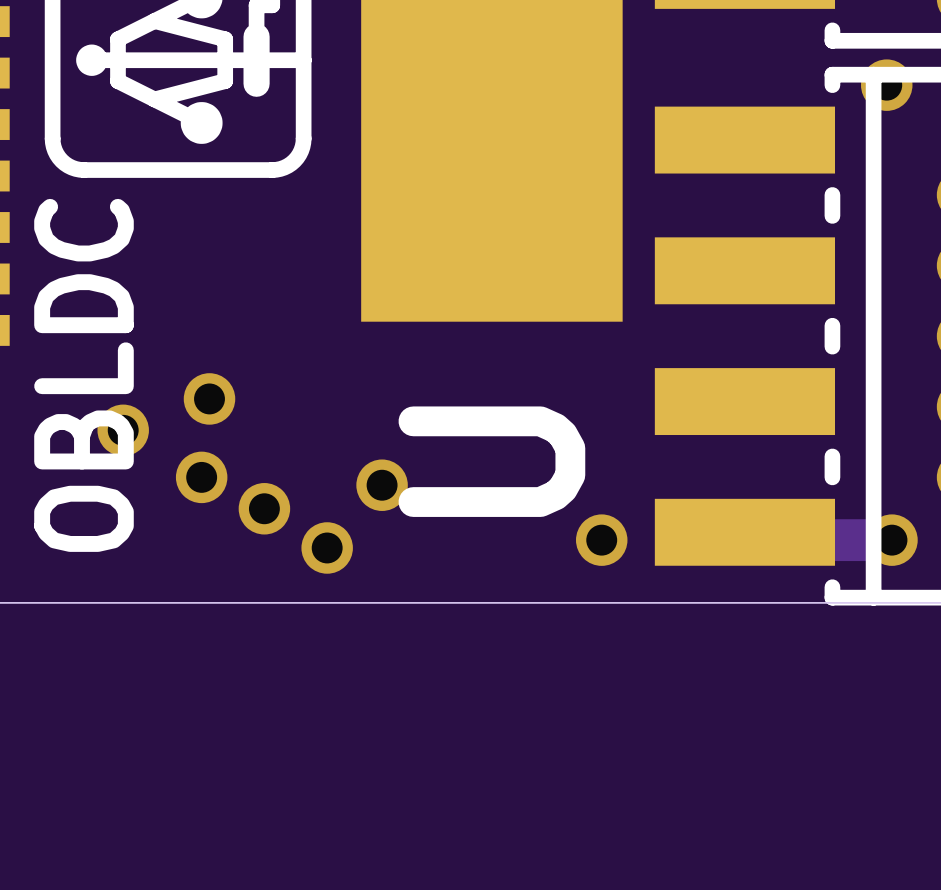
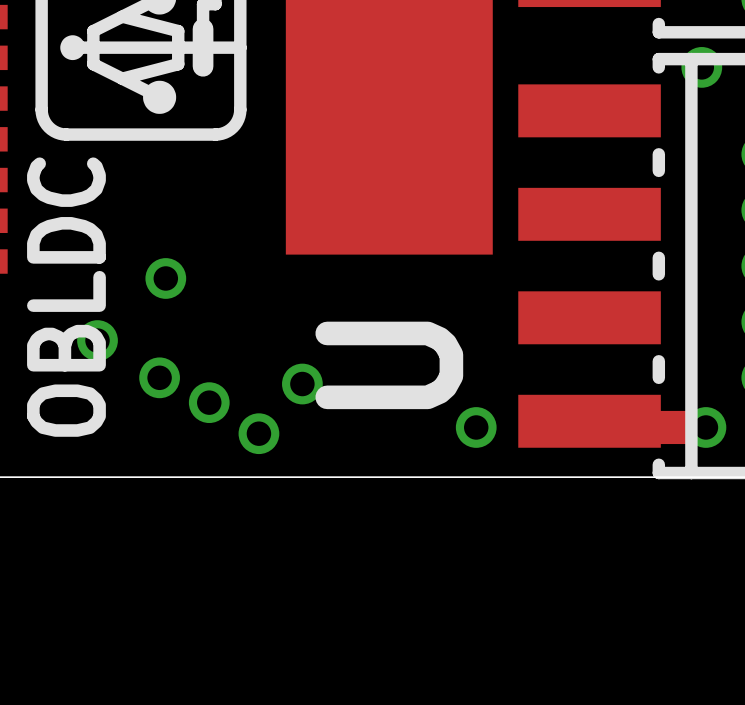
via position: (209, 398) -> (165, 278)

